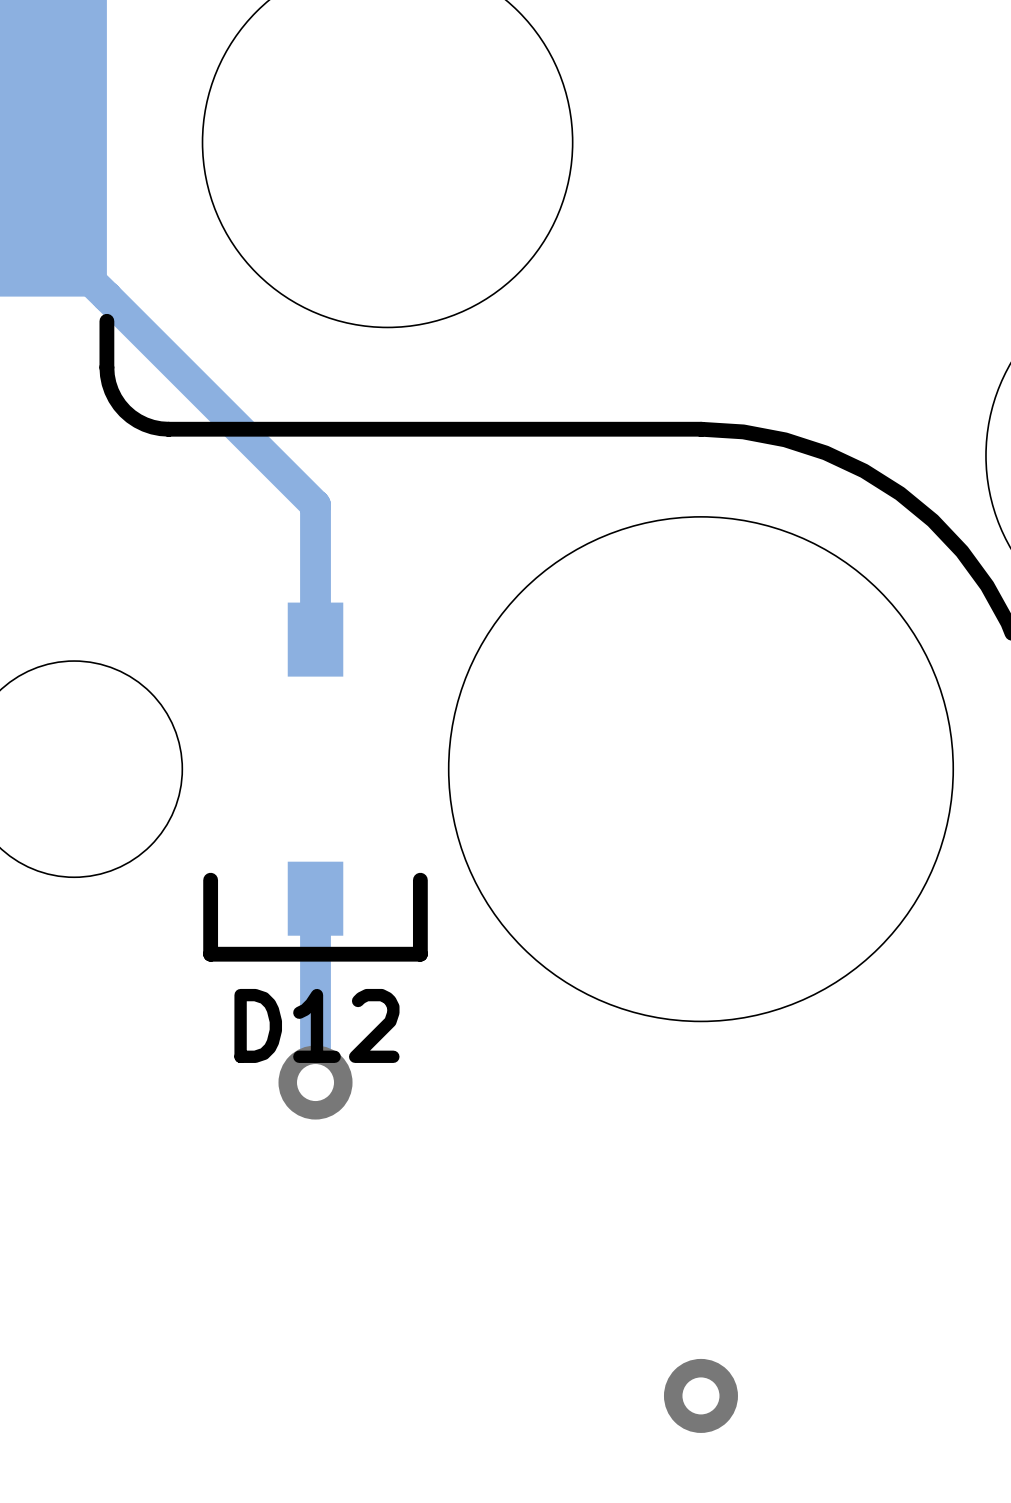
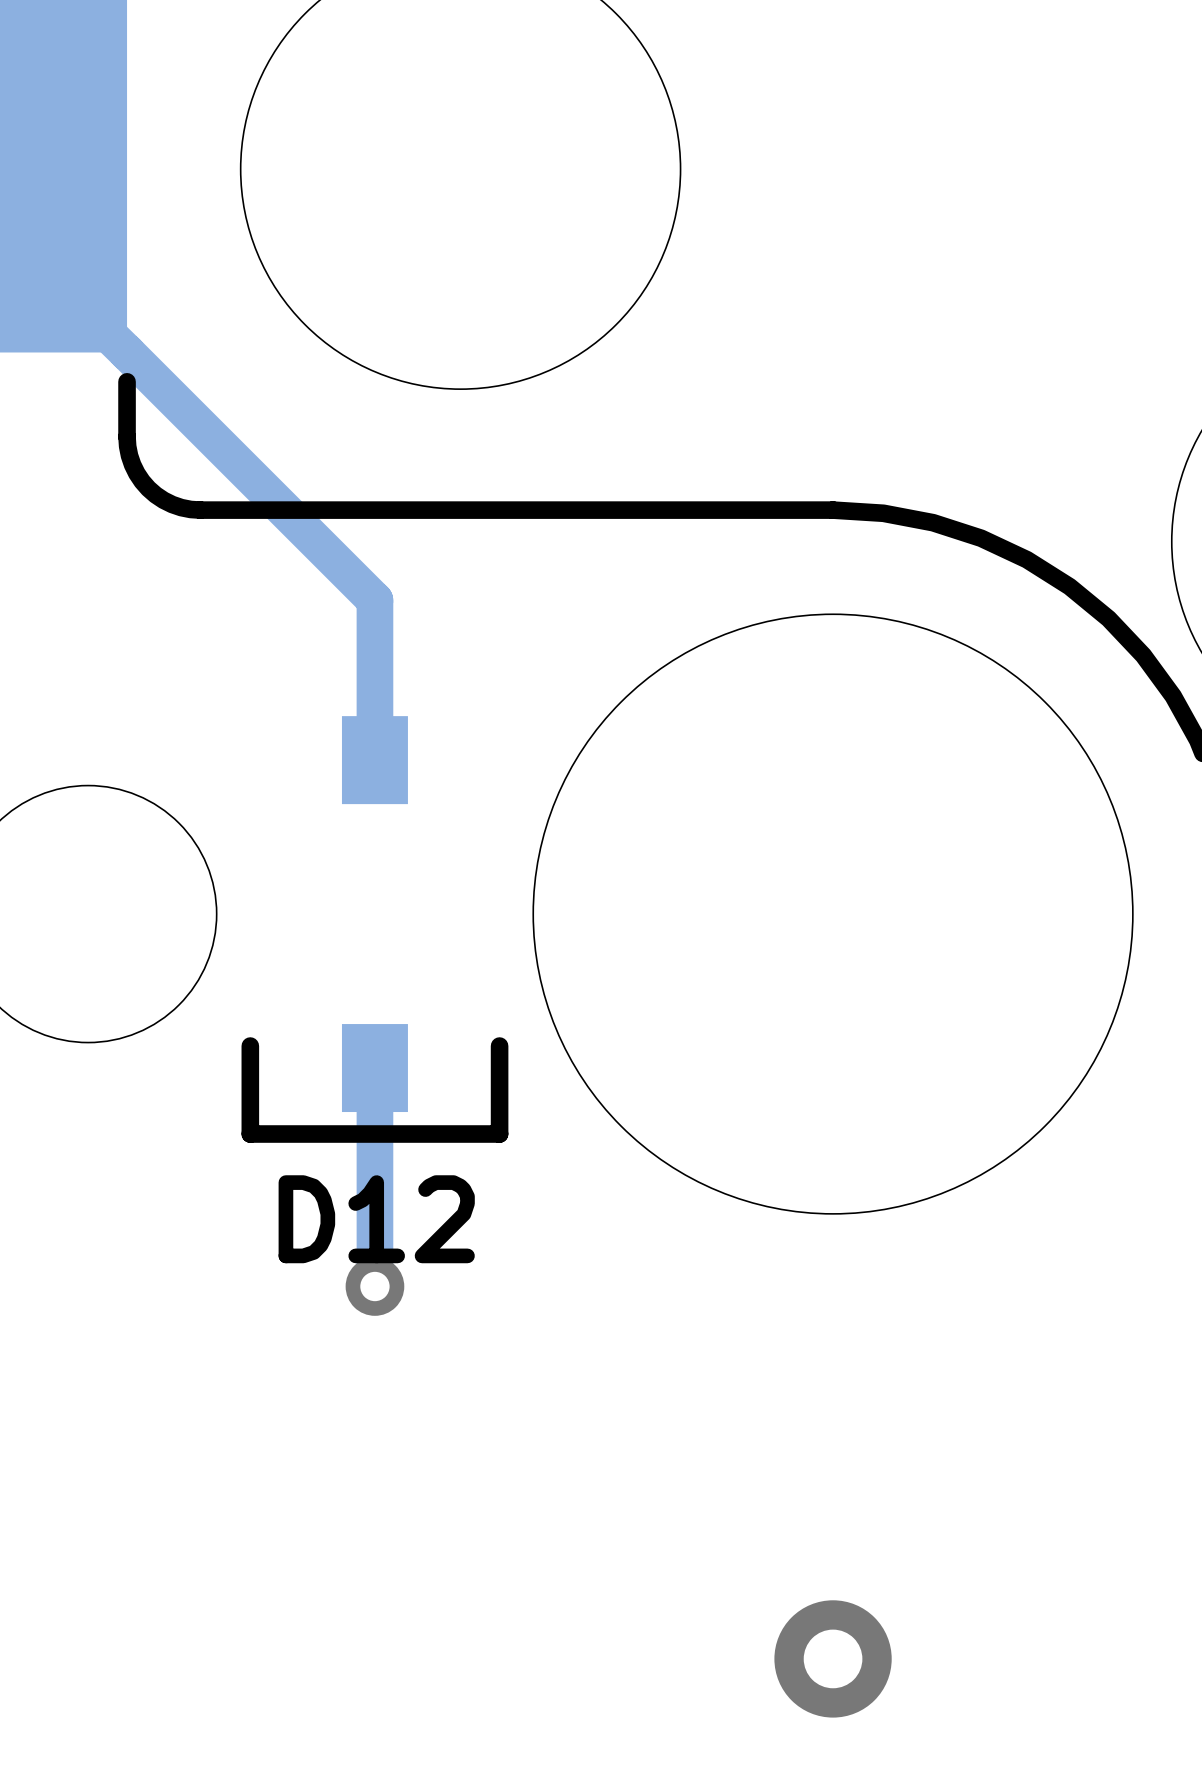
via size: [278, 1045, 353, 1120] -> [345, 1257, 405, 1316]
via size: [663, 1358, 738, 1433] -> [774, 1600, 892, 1718]

